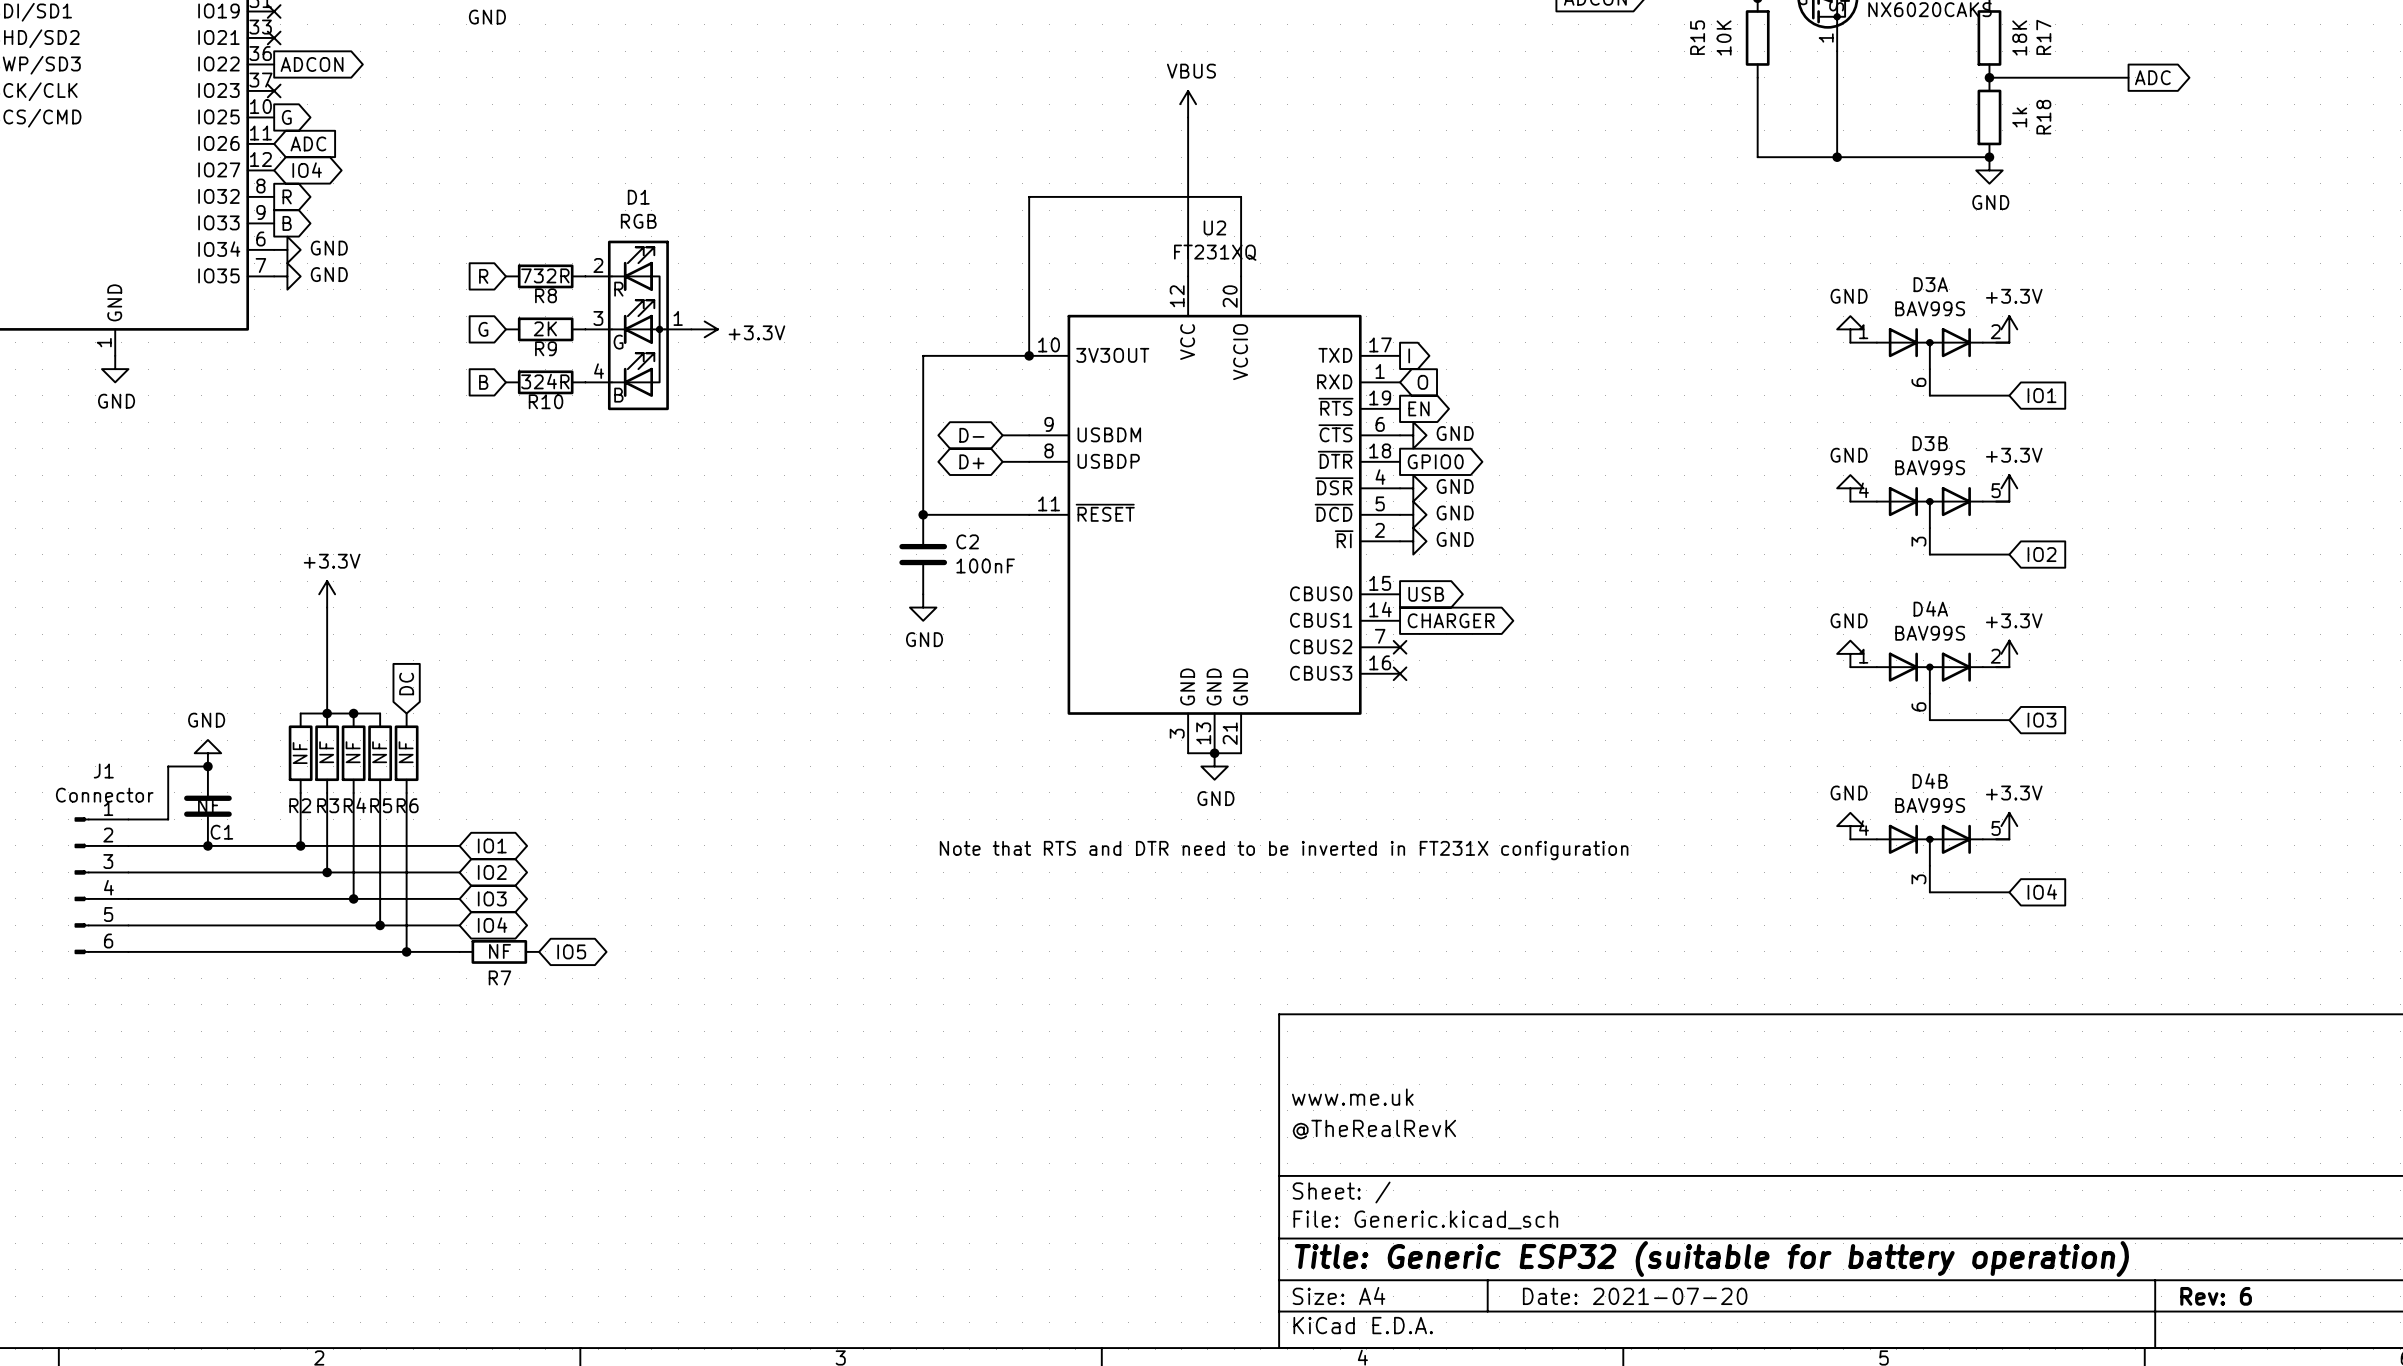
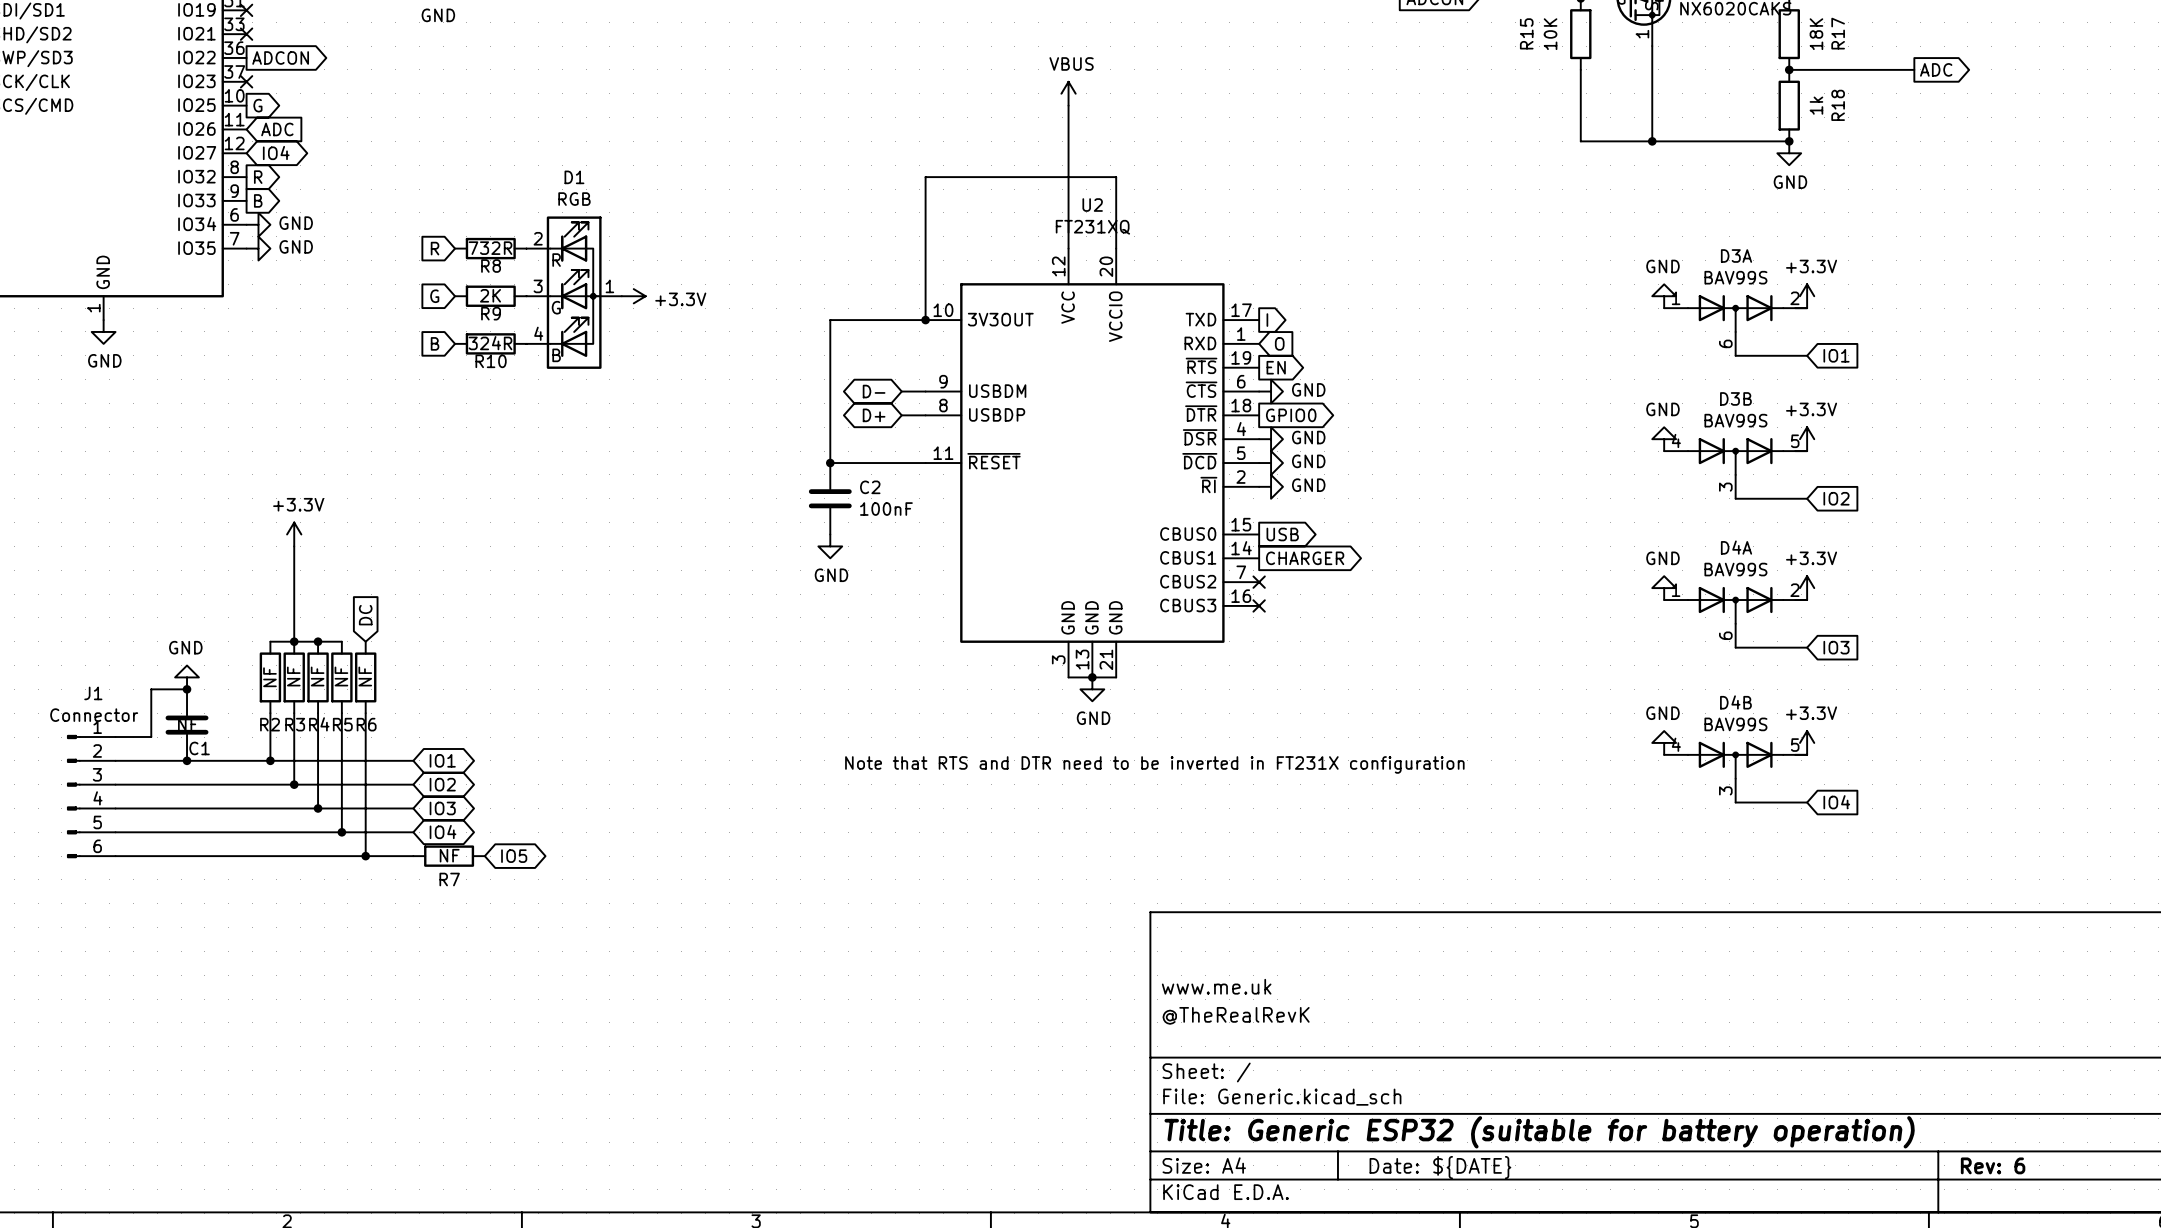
title block: Date: 2021-07-20 (1635, 1296) -> Date: ${DATE} (1440, 1167)

